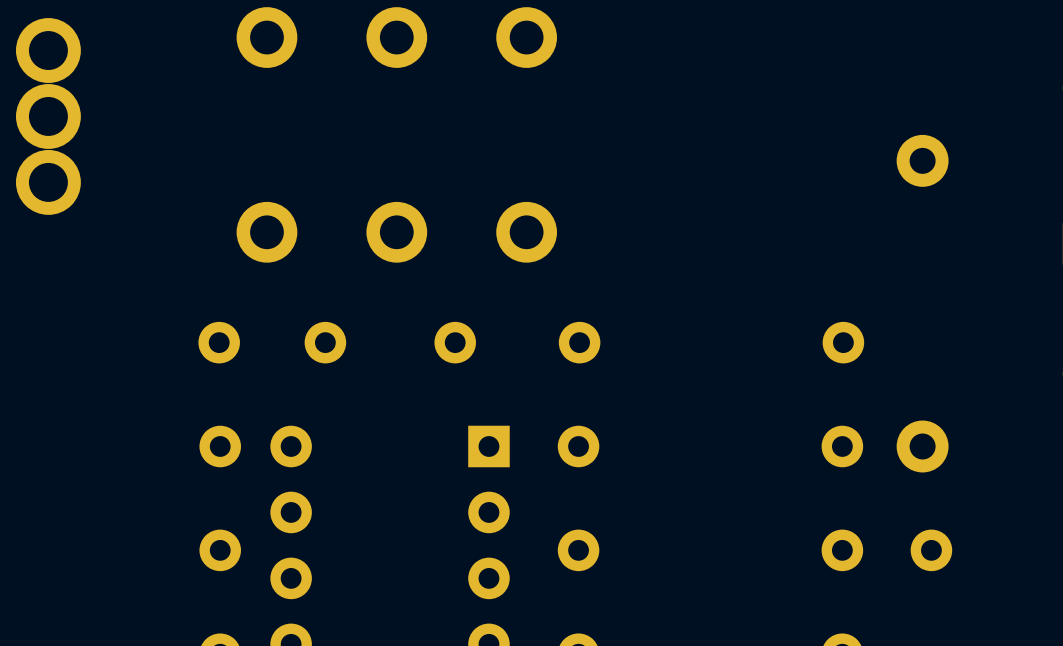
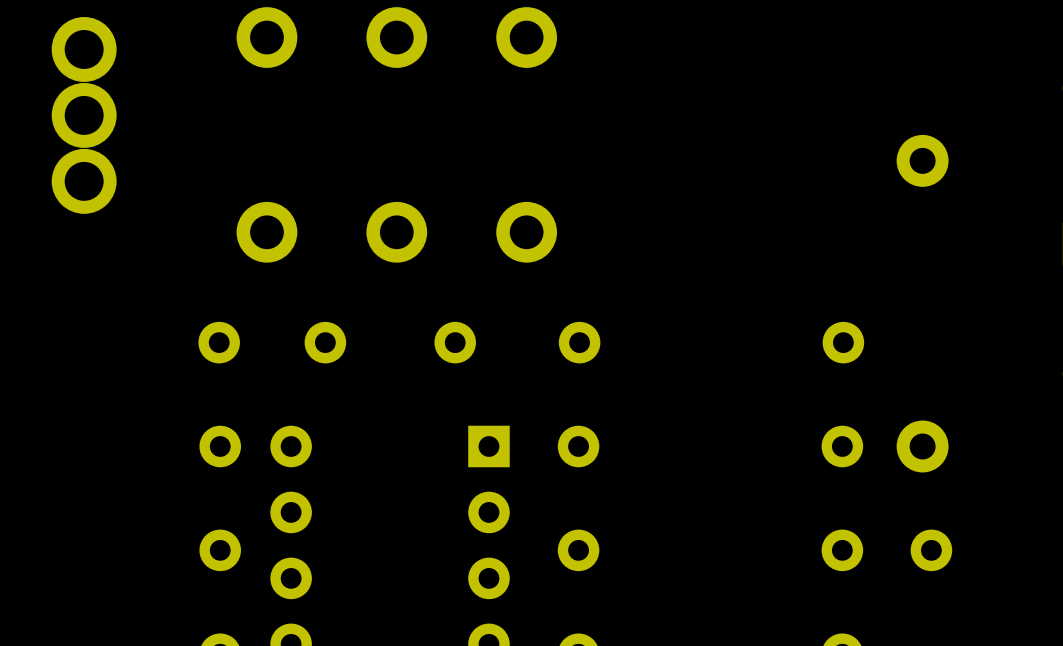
part position: (48, 116) -> (84, 115)

